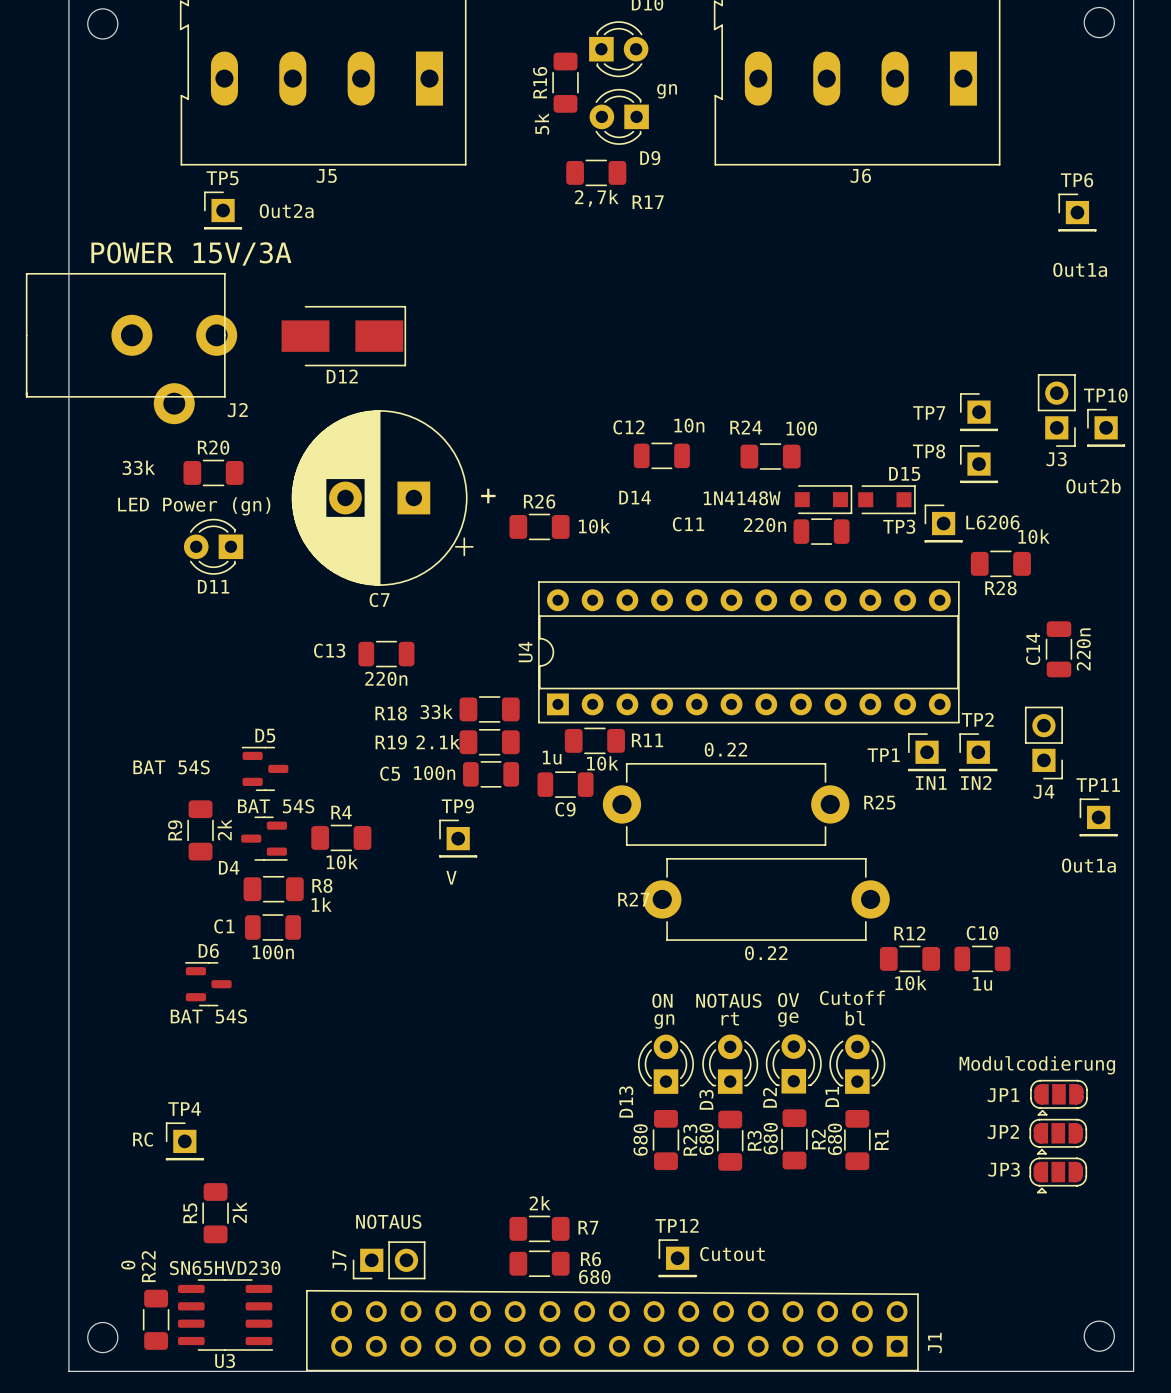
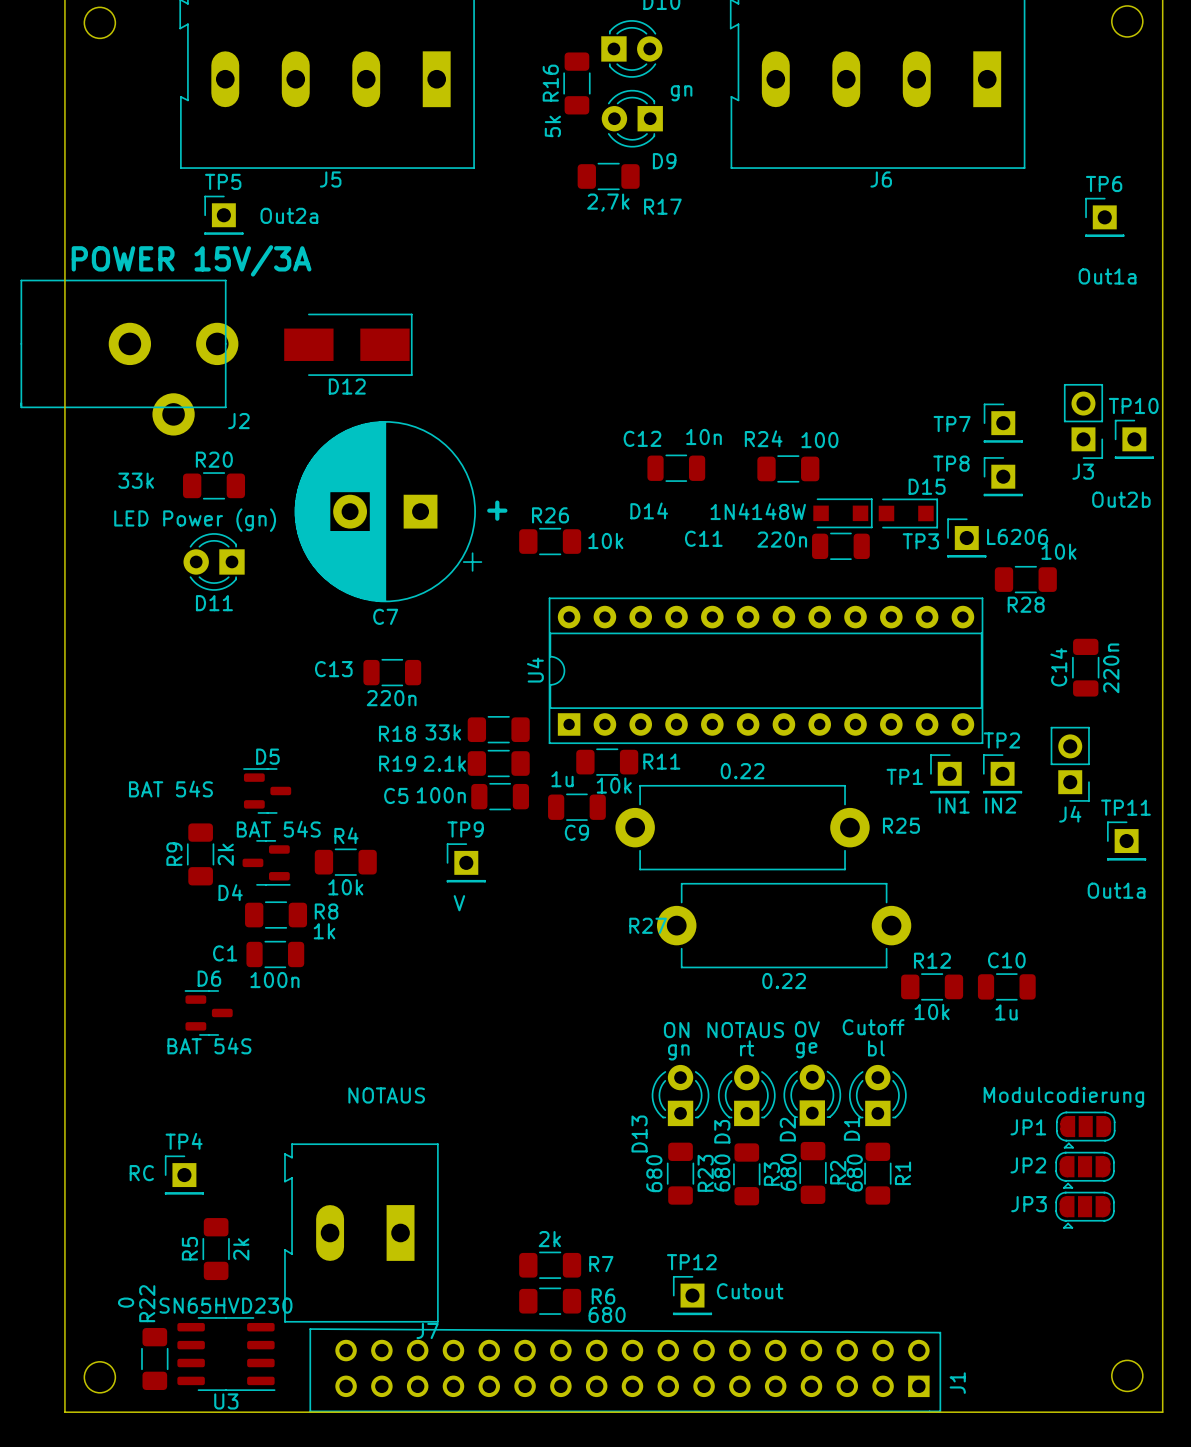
text position: NOTAUS (388, 1221) -> NOTAUS (386, 1095)
J7 footprint: [352, 1241, 426, 1280] -> [284, 1143, 439, 1323]
J7 name position: J7 (339, 1260) -> J7 (427, 1330)

